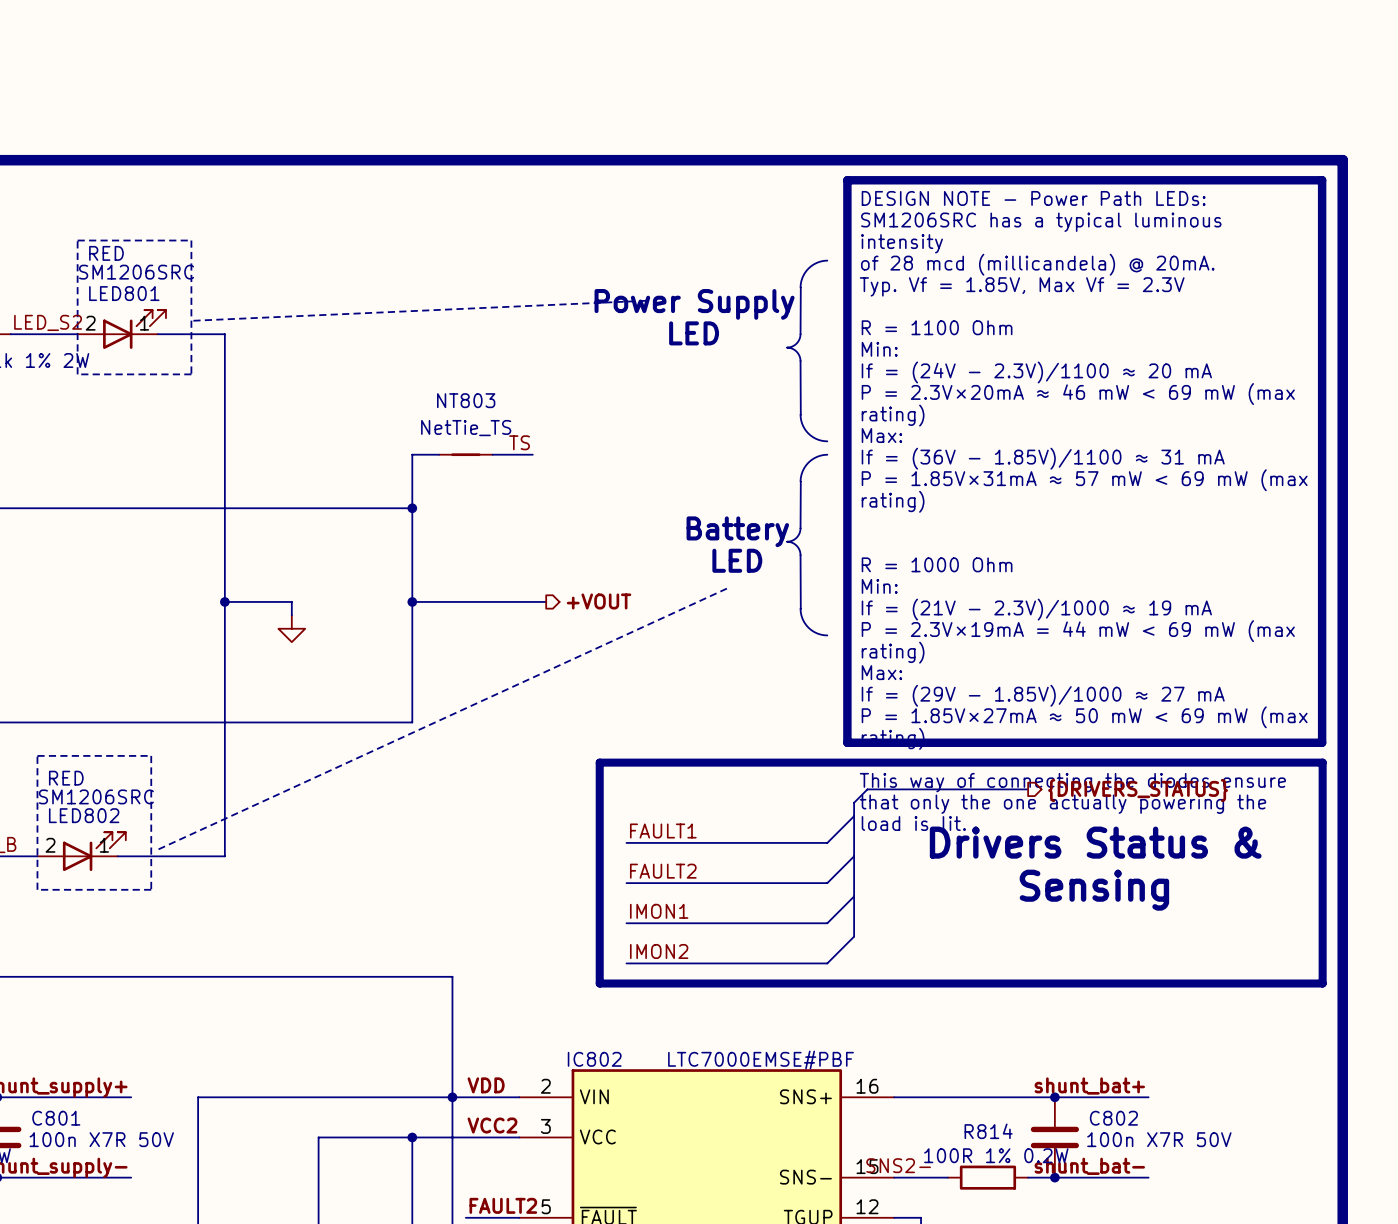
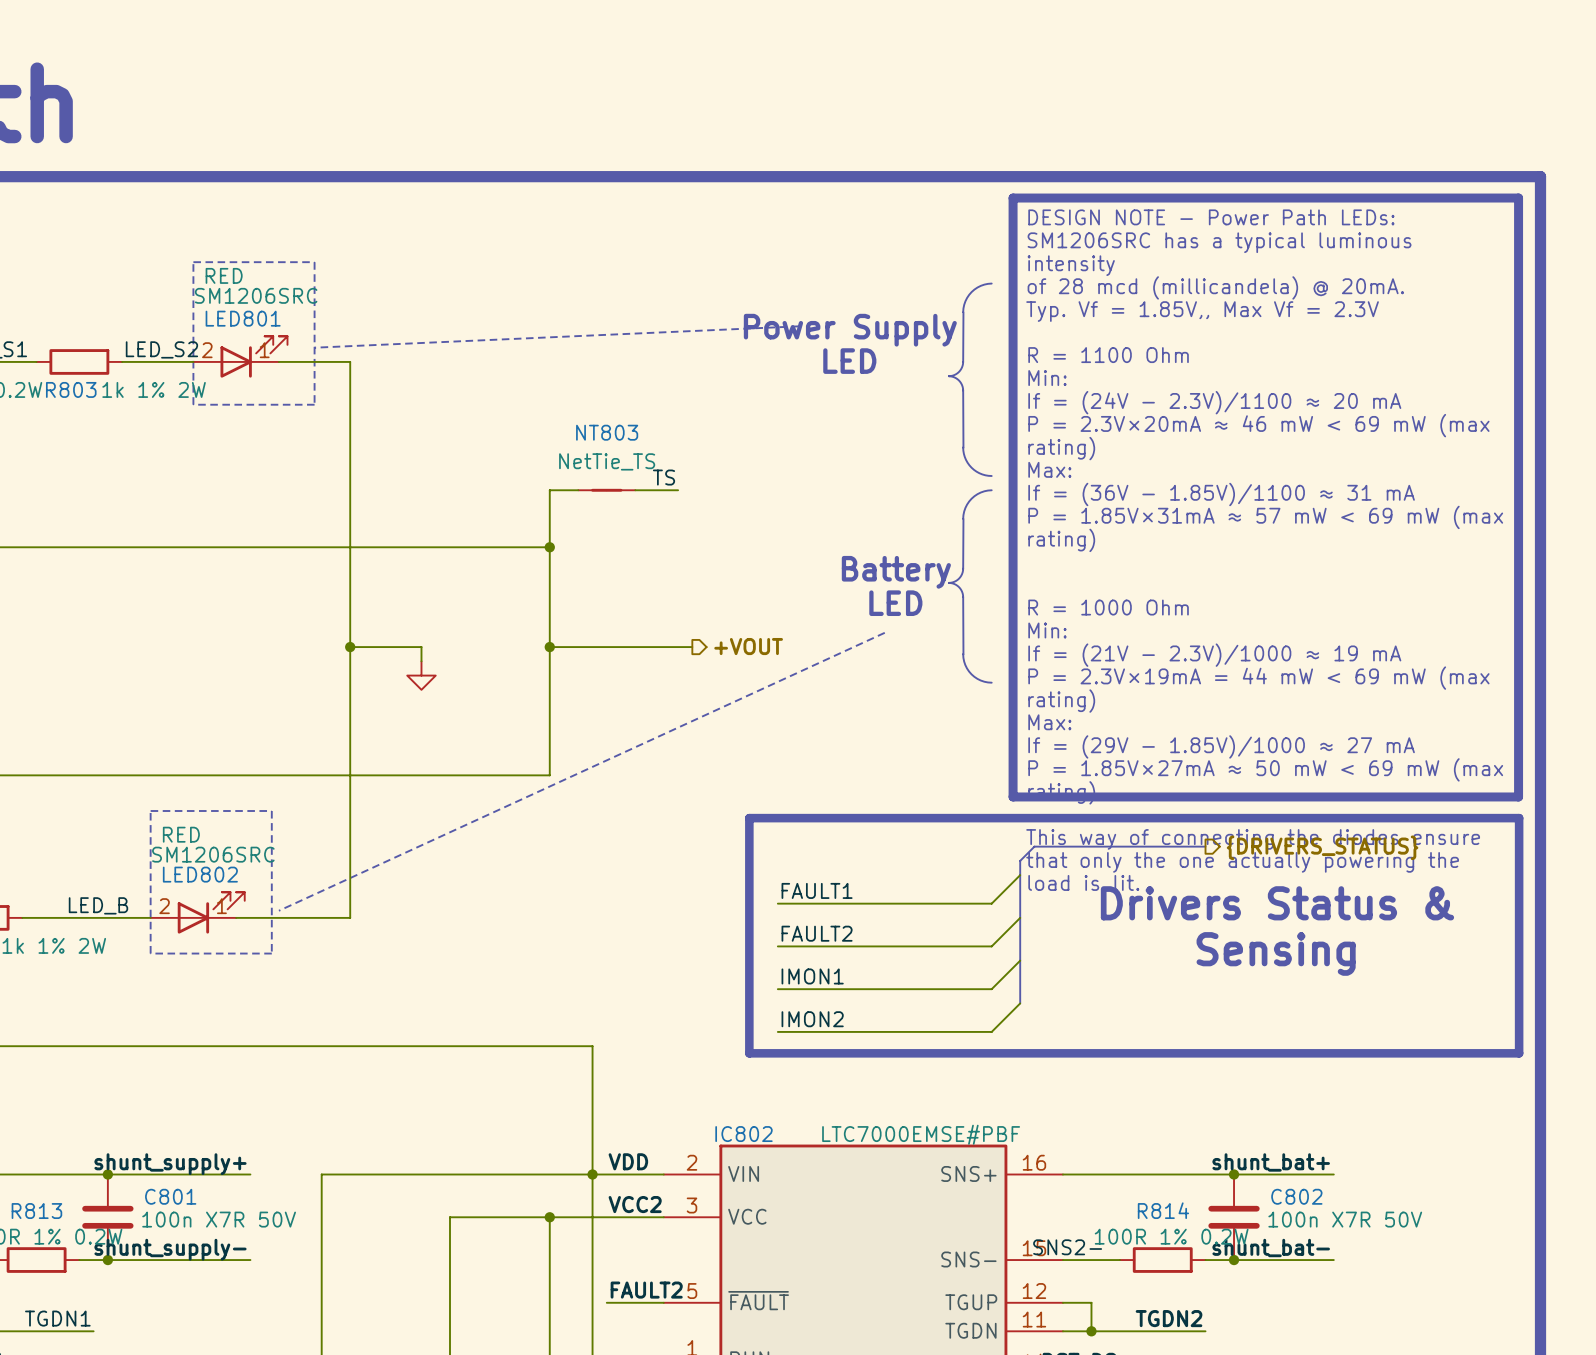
text: Typ. Vf = 1.85V, Max Vf = 2.3V (1022, 286) -> Typ. Vf = 1.85V,, Max Vf = 2.3V (1202, 311)

